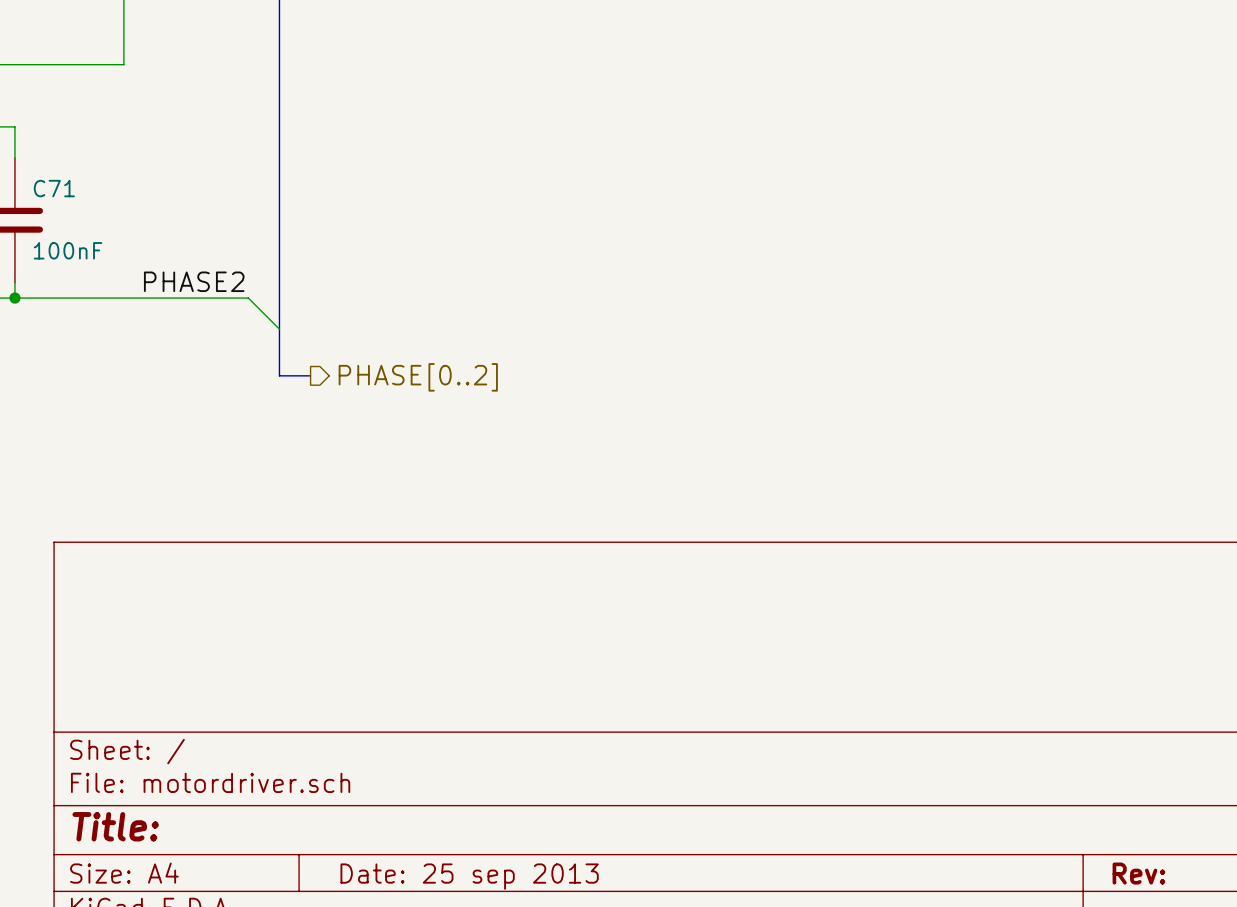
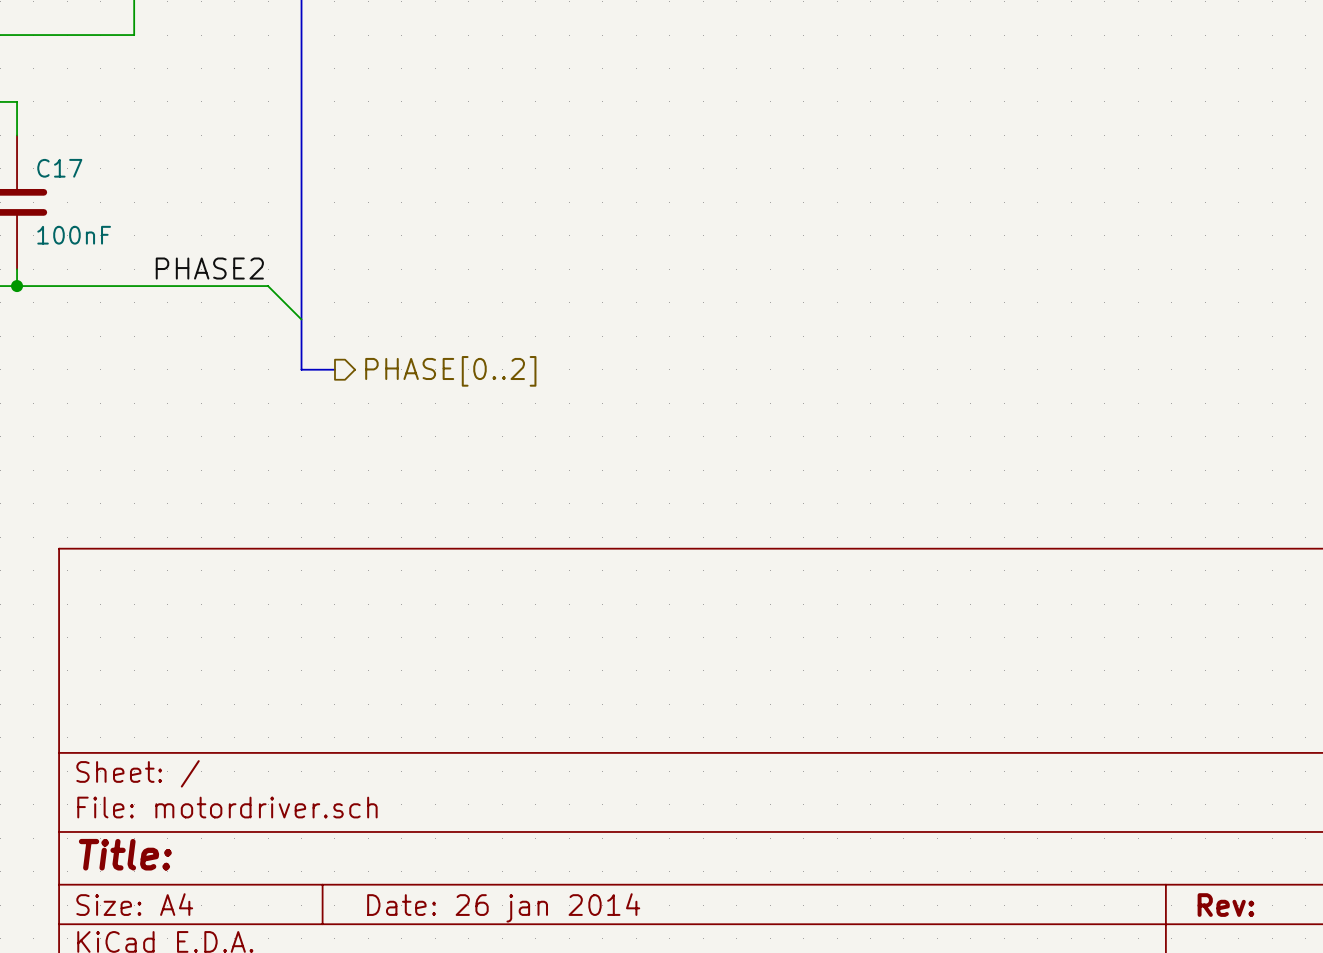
C71 name: C71 (54, 188) -> C17 (59, 168)
title block: Date: 25 sep 2013 (469, 876) -> Date: 26 jan 2014 (503, 907)

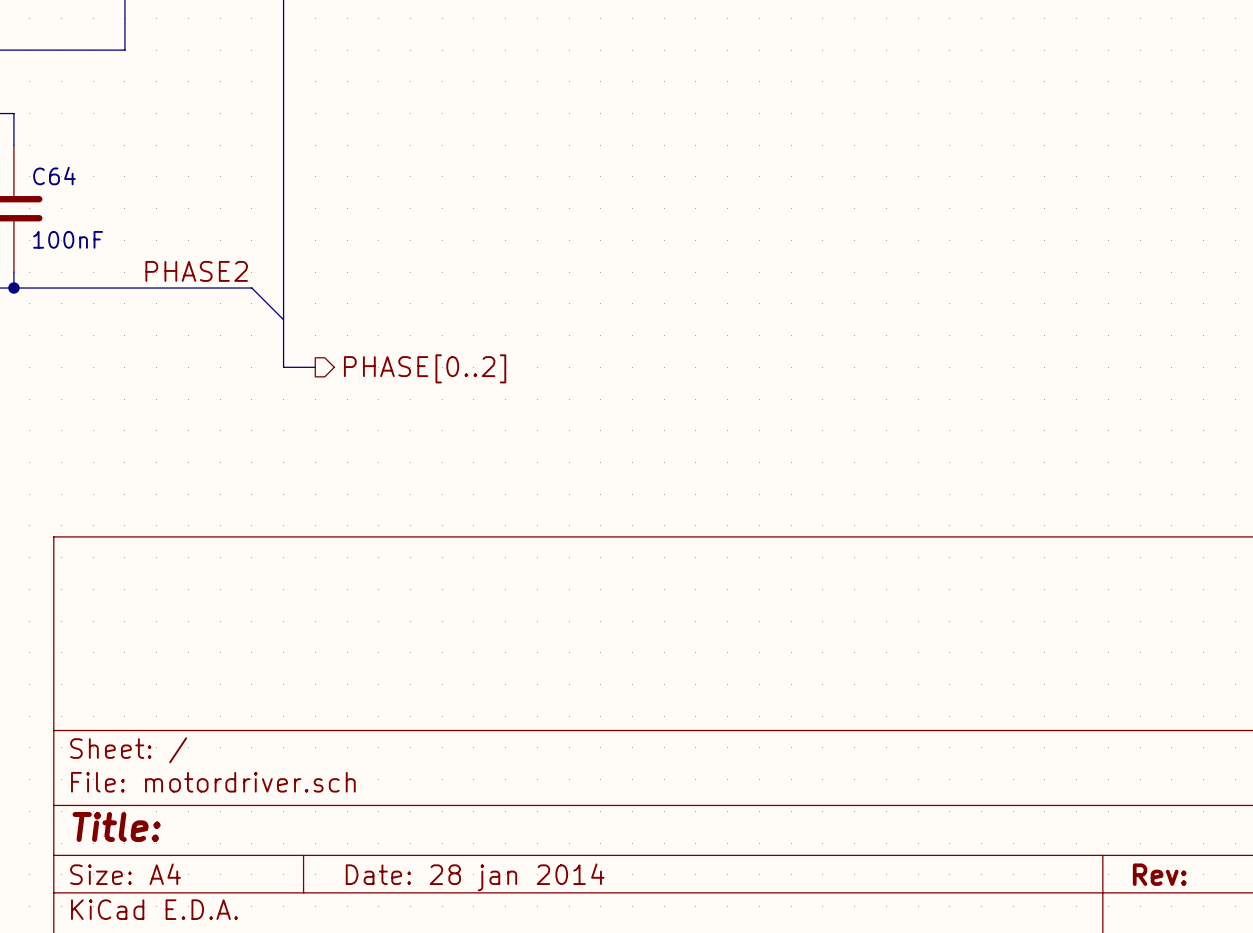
C17 name: C17 (59, 168) -> C64 (54, 176)
title block: Date: 26 jan 2014 (503, 907) -> Date: 28 jan 2014 (475, 877)

